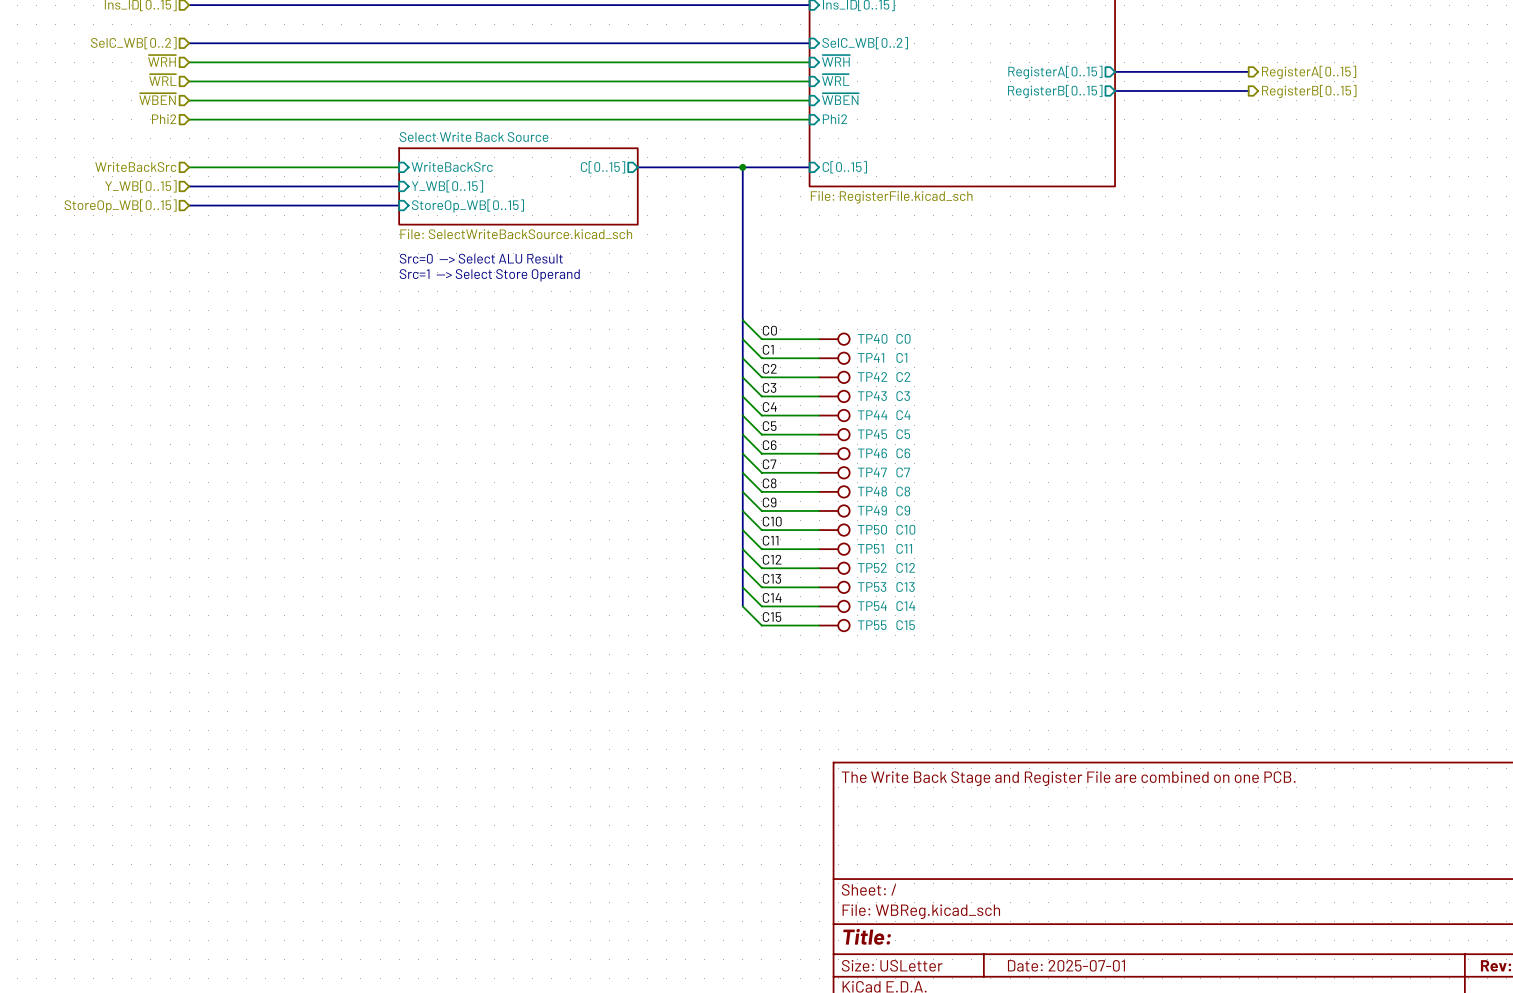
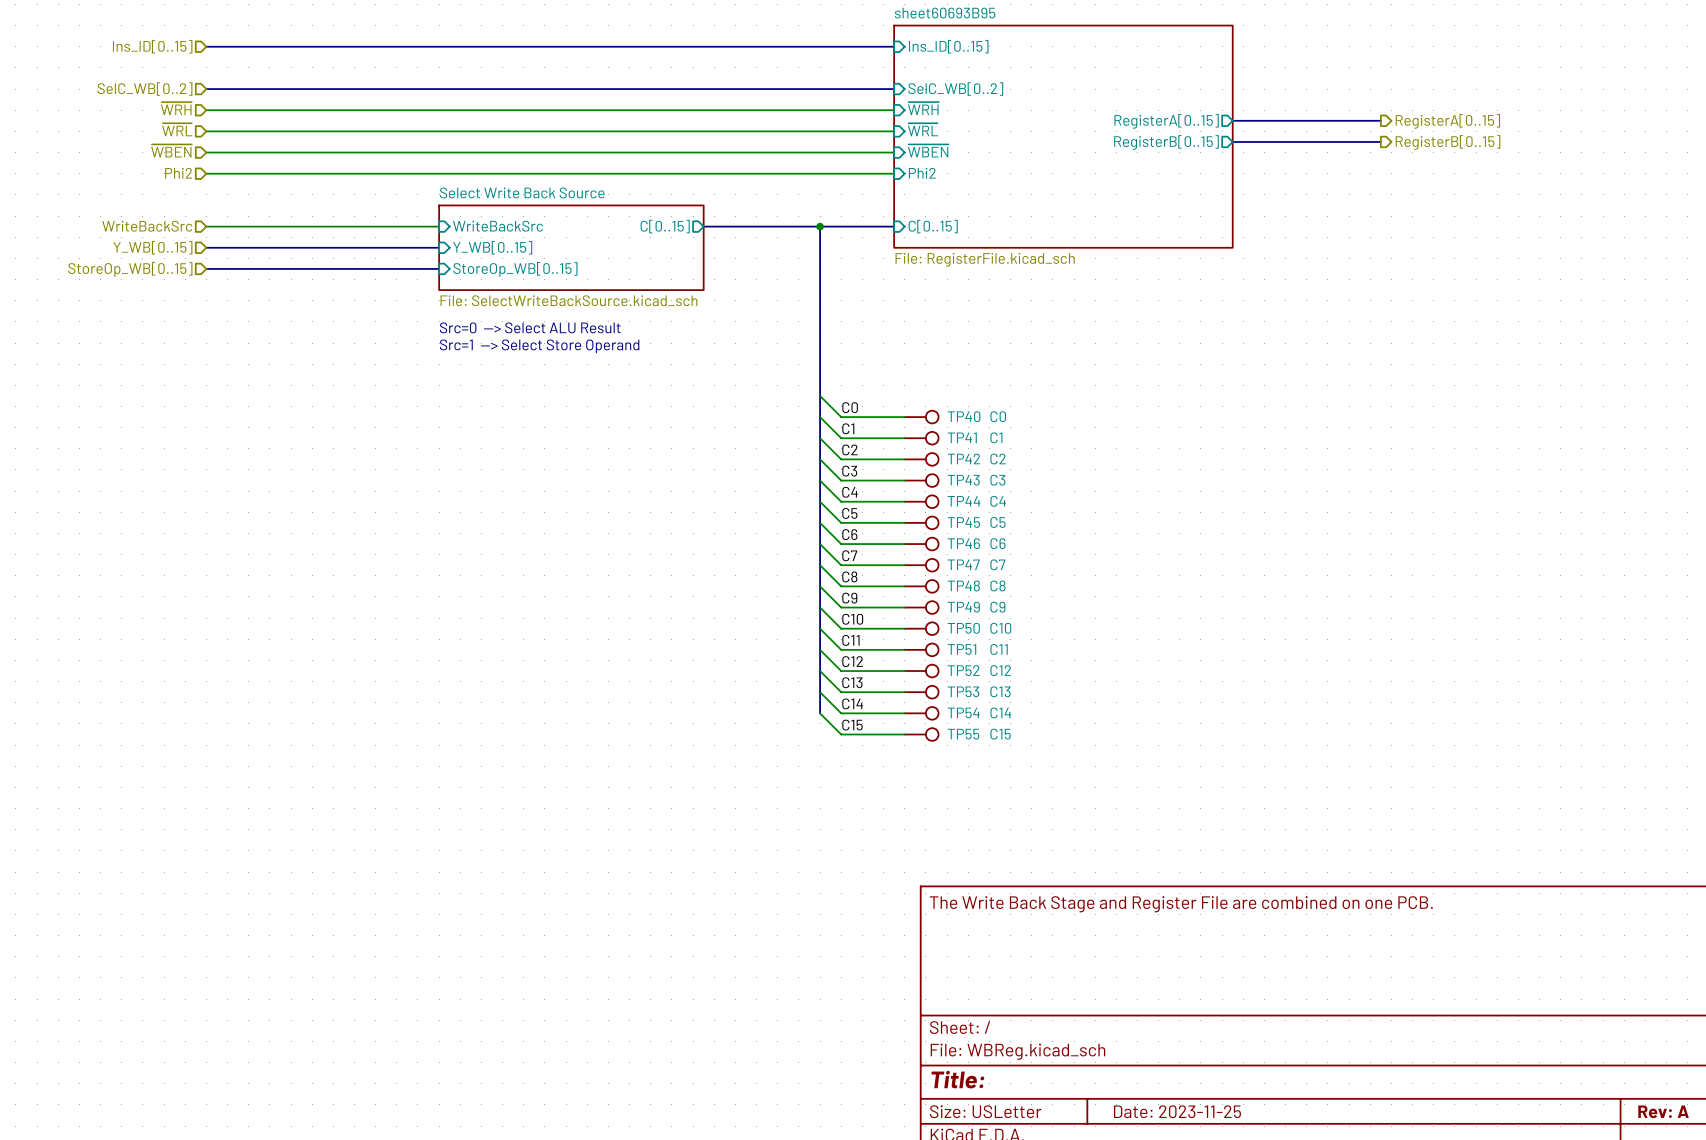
title block: Date: 2025-07-01 (1066, 965) -> Date: 2023-11-25 (1177, 1111)

